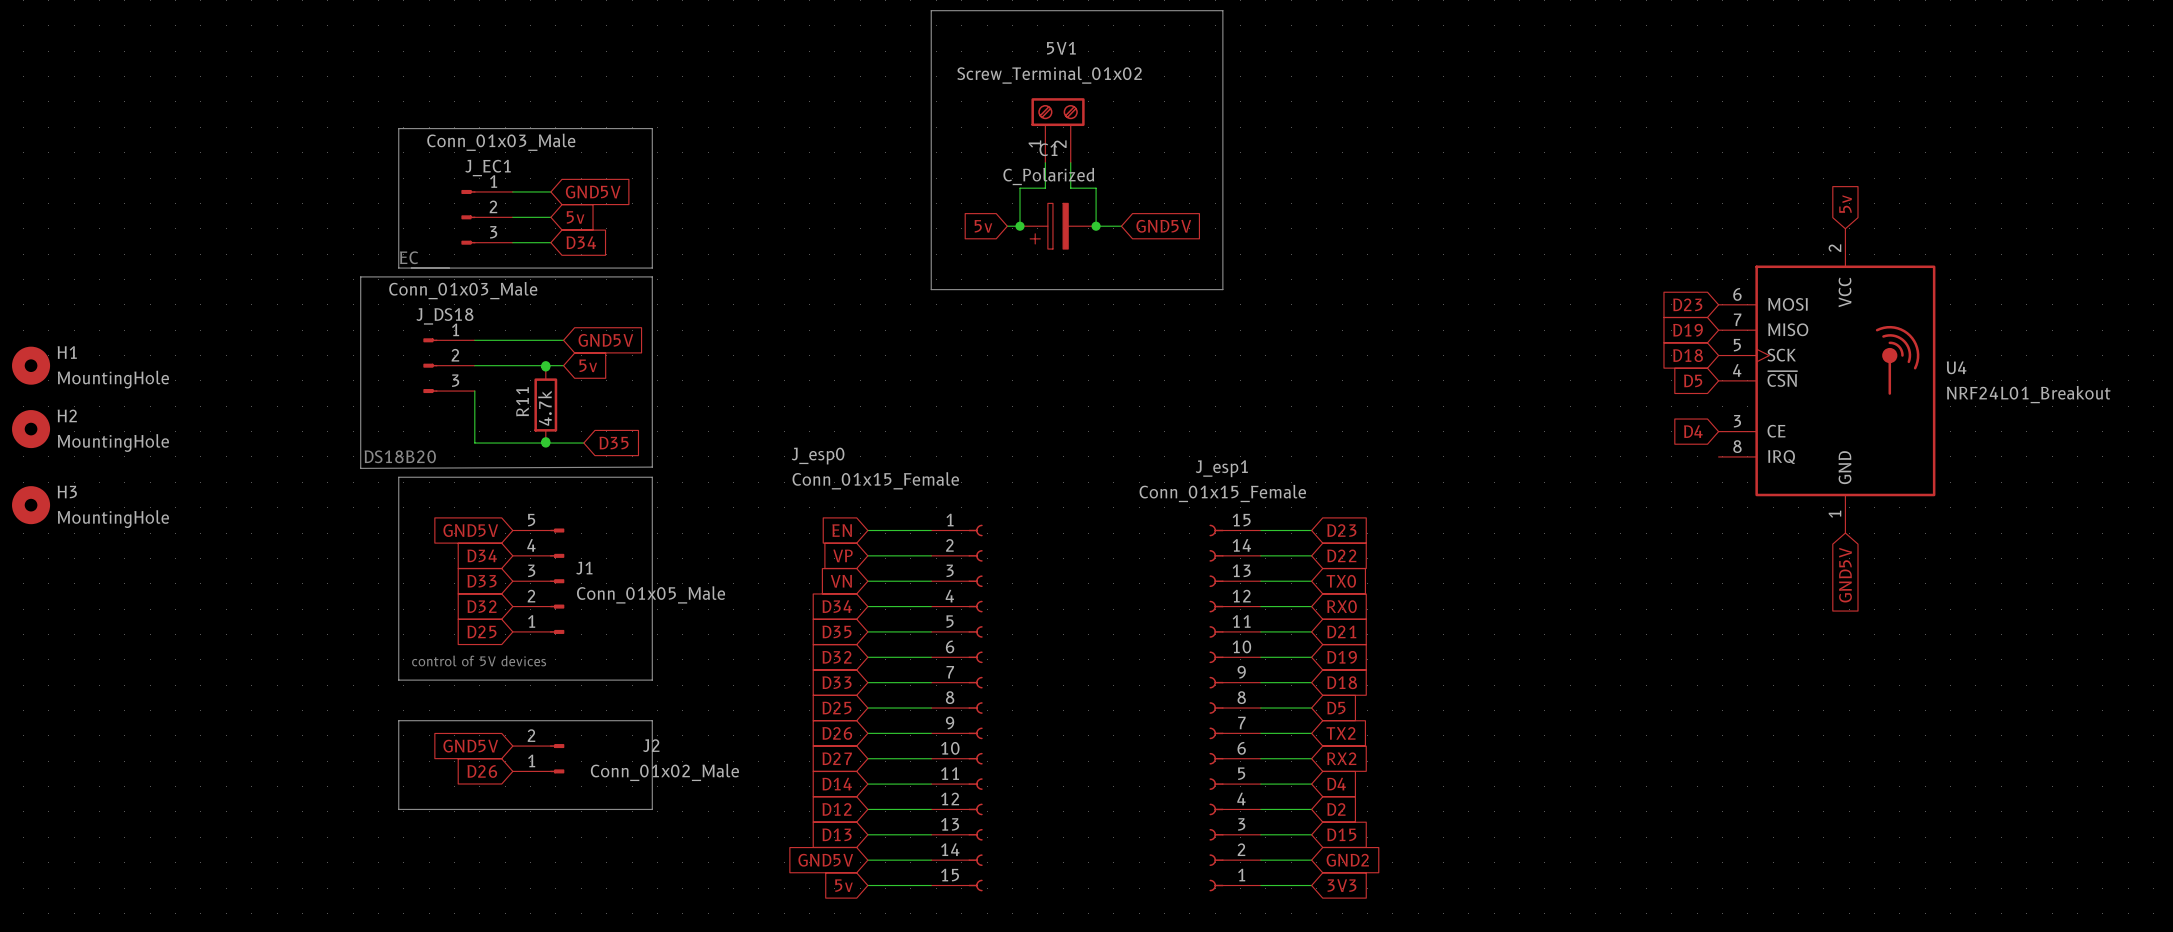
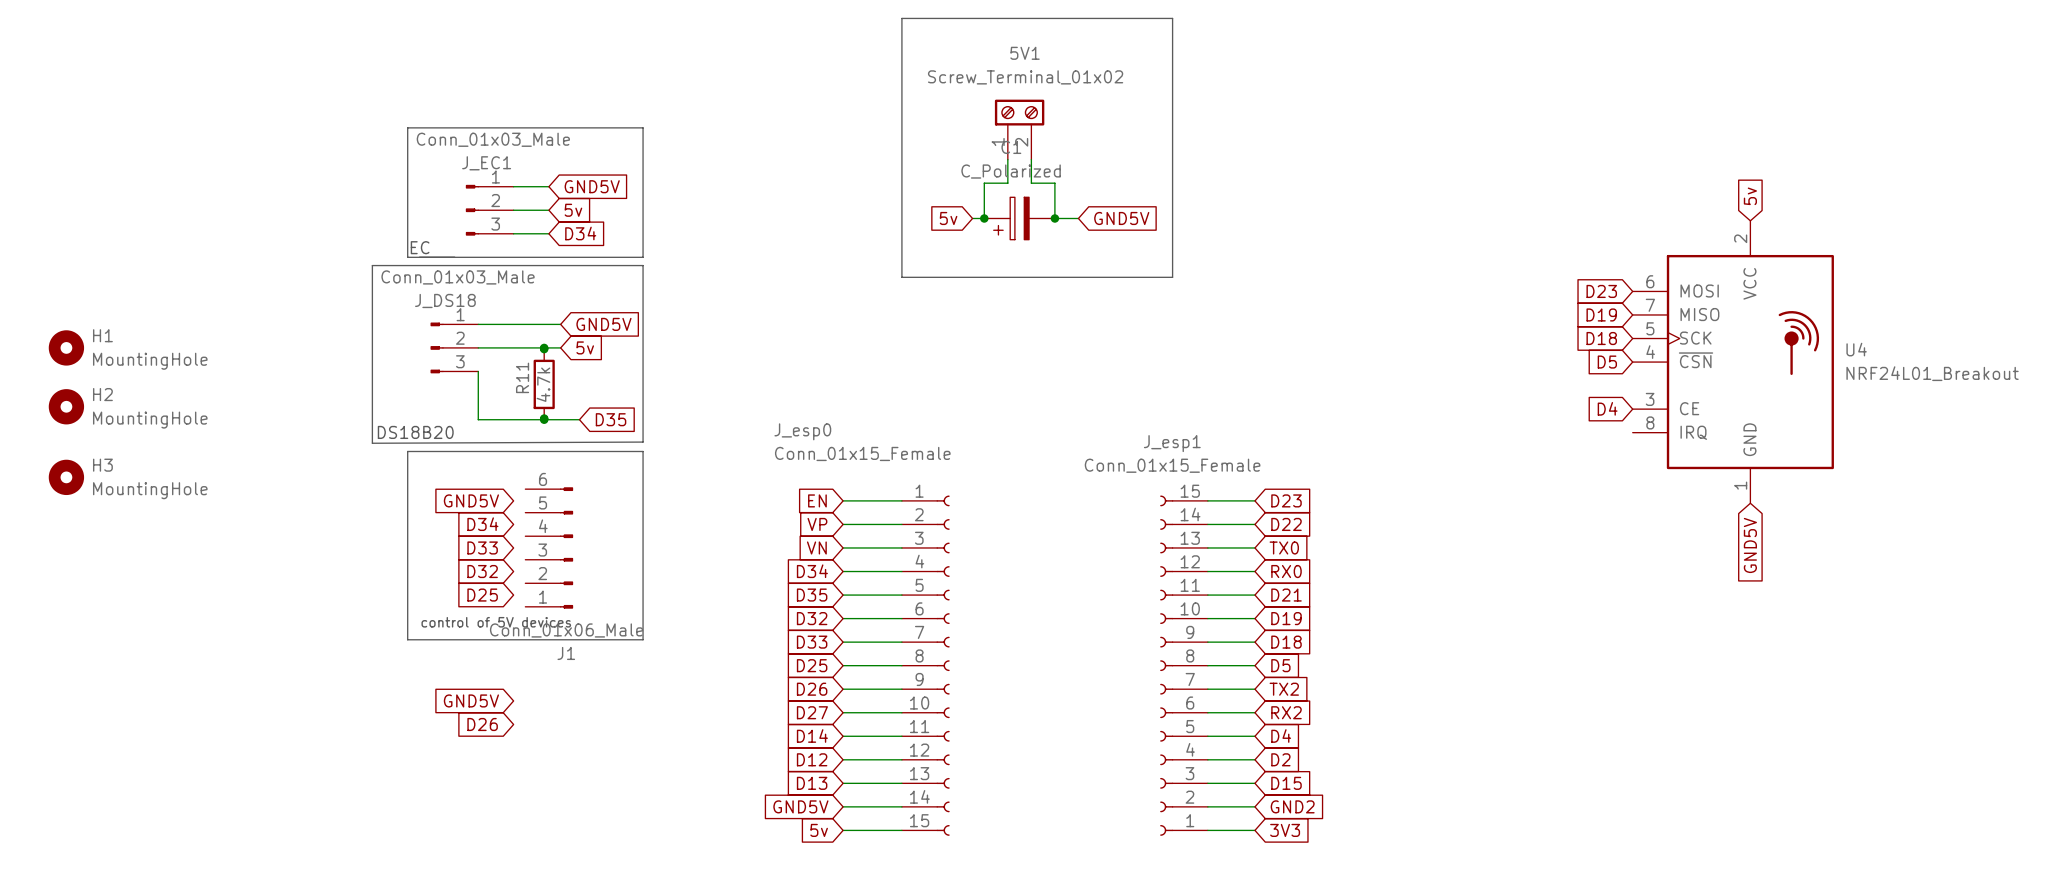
J1 symbol: [512, 528, 565, 634] -> [525, 487, 574, 609]
J1 name position: J1 (584, 568) -> J1 (566, 653)
J1 value: Conn_01x05_Male (651, 594) -> Conn_01x06_Male (566, 630)
line: (398, 720) (652, 720) (652, 809) (398, 809) (398, 720) -> none
J2: Conn_01x02_Male (538, 758) -> none

